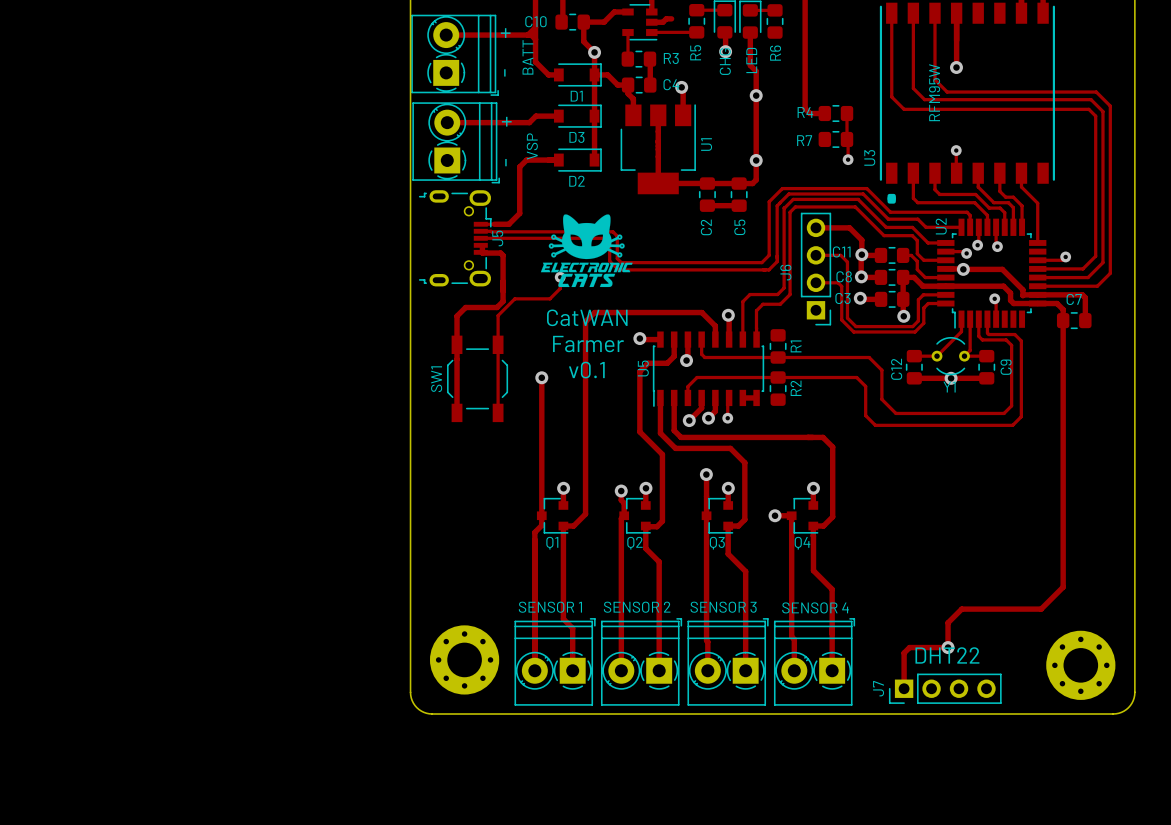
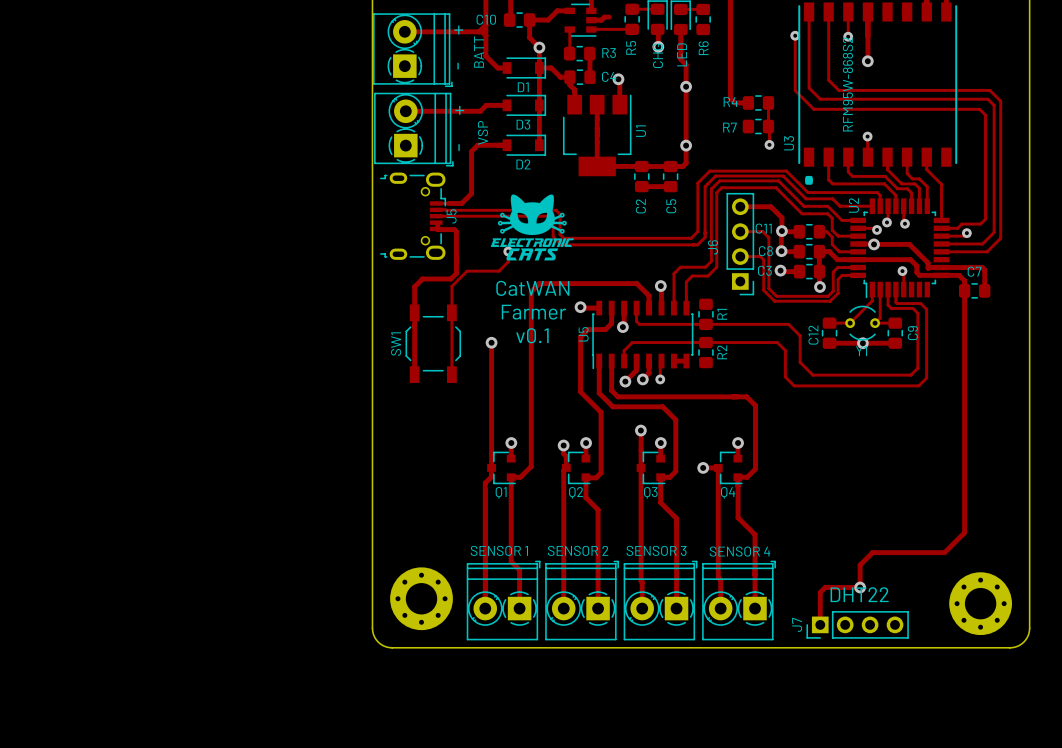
track: (934, 13) (934, 79) (947, 92) (1096, 92) (1110, 106) (1110, 273) (1097, 286) (1037, 286) -> (848, 12) (848, 36)
track: none -> (795, 35) (795, 90) (813, 109) (979, 109) (985, 115) (985, 219) (980, 224) (961, 224) (957, 228) (941, 228)
via: none -> (795, 35)
via: none -> (848, 36)
U3 value: RFM95W (934, 92) -> RFM95W-868S2 (847, 84)

